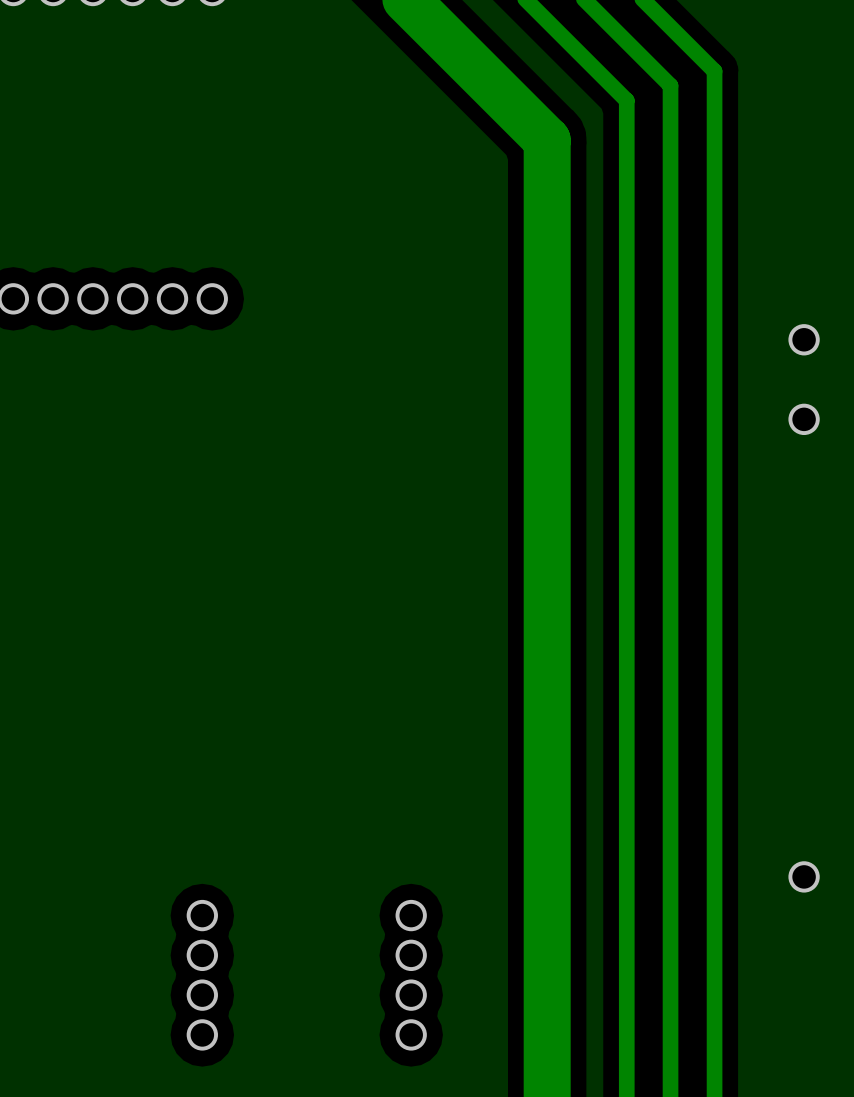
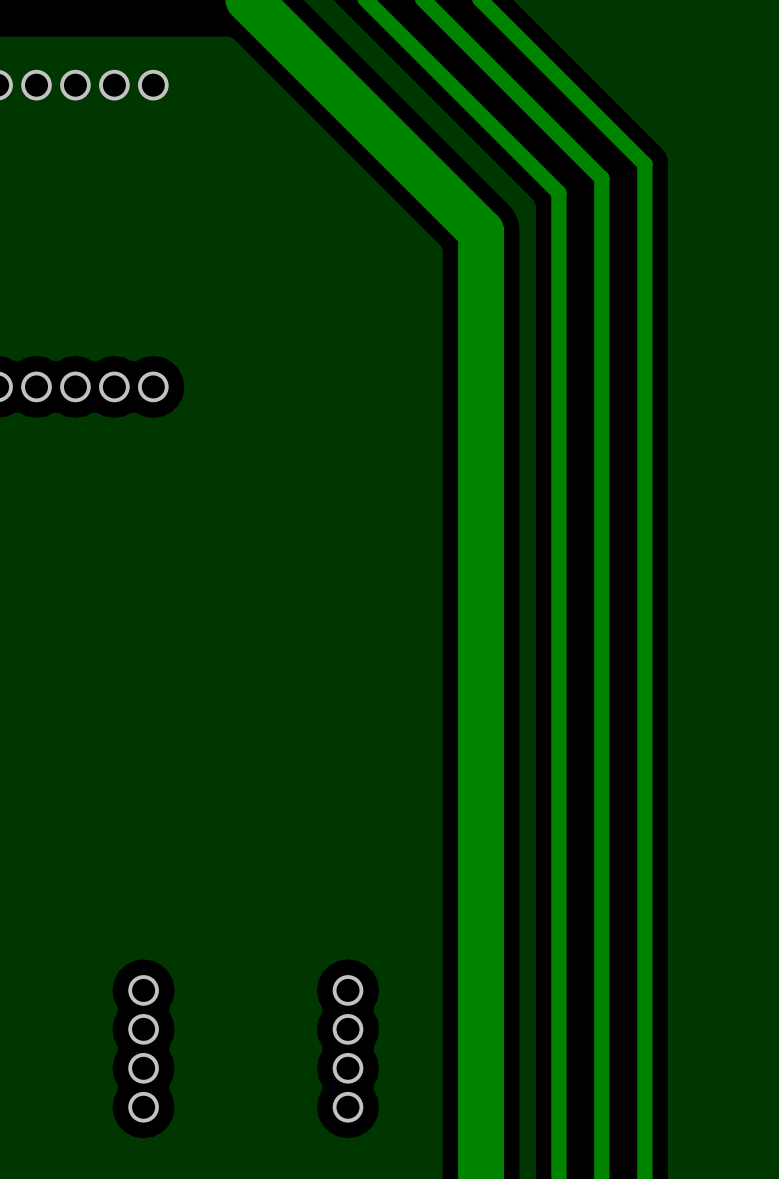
via: (804, 339) -> none
via: (804, 419) -> none
via: (804, 876) -> none

